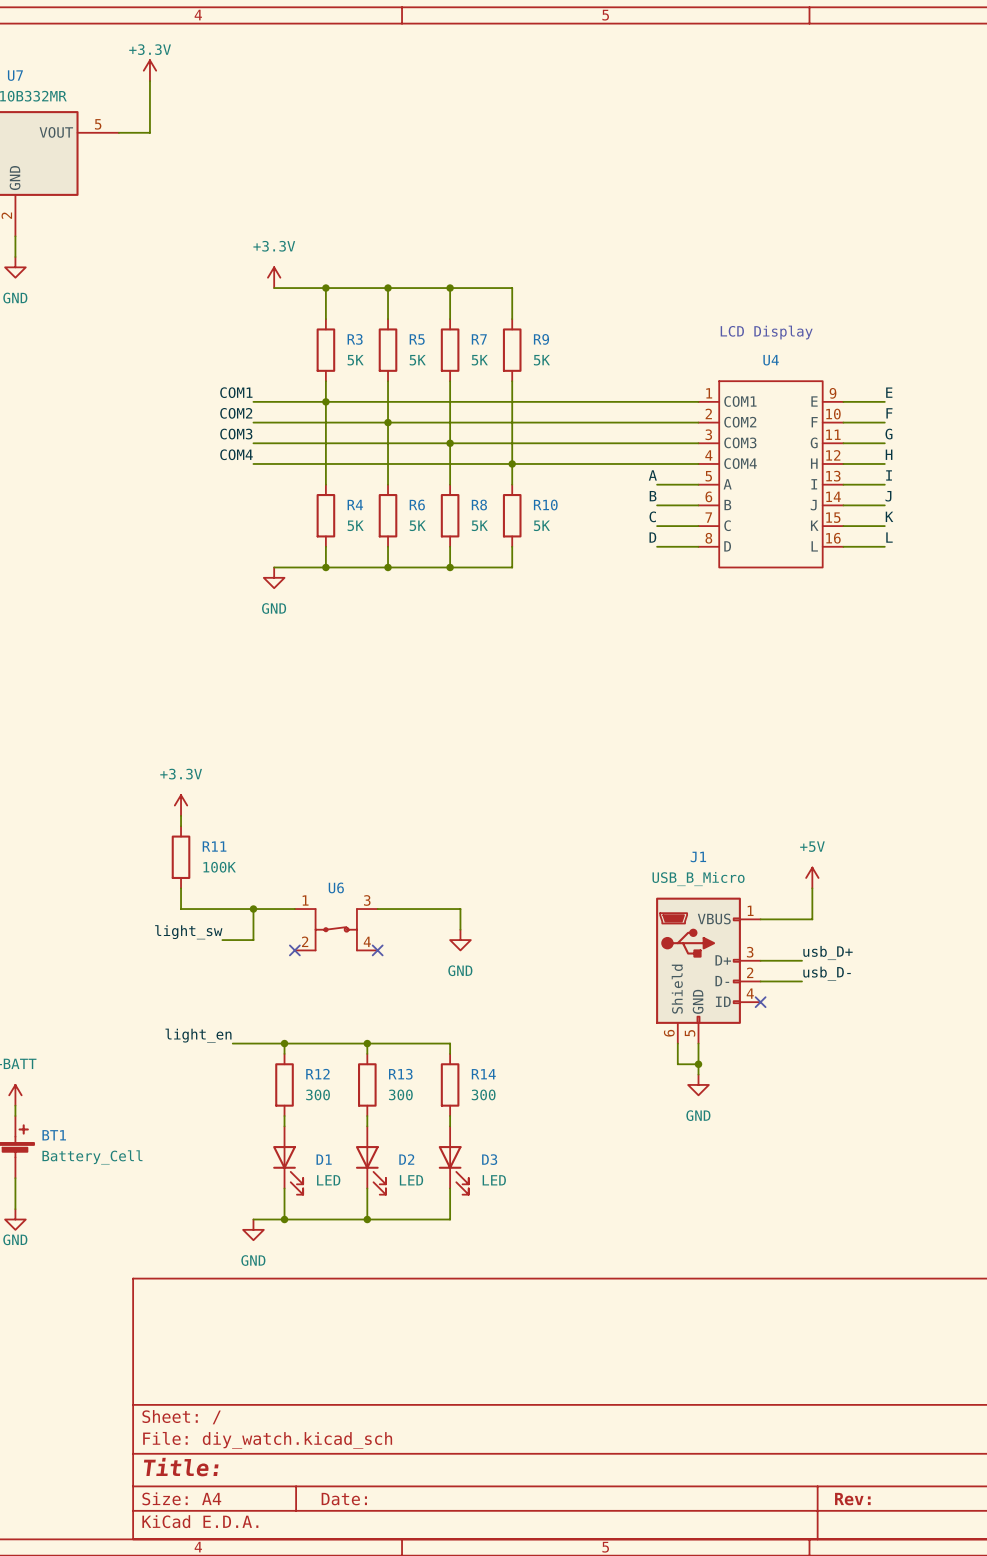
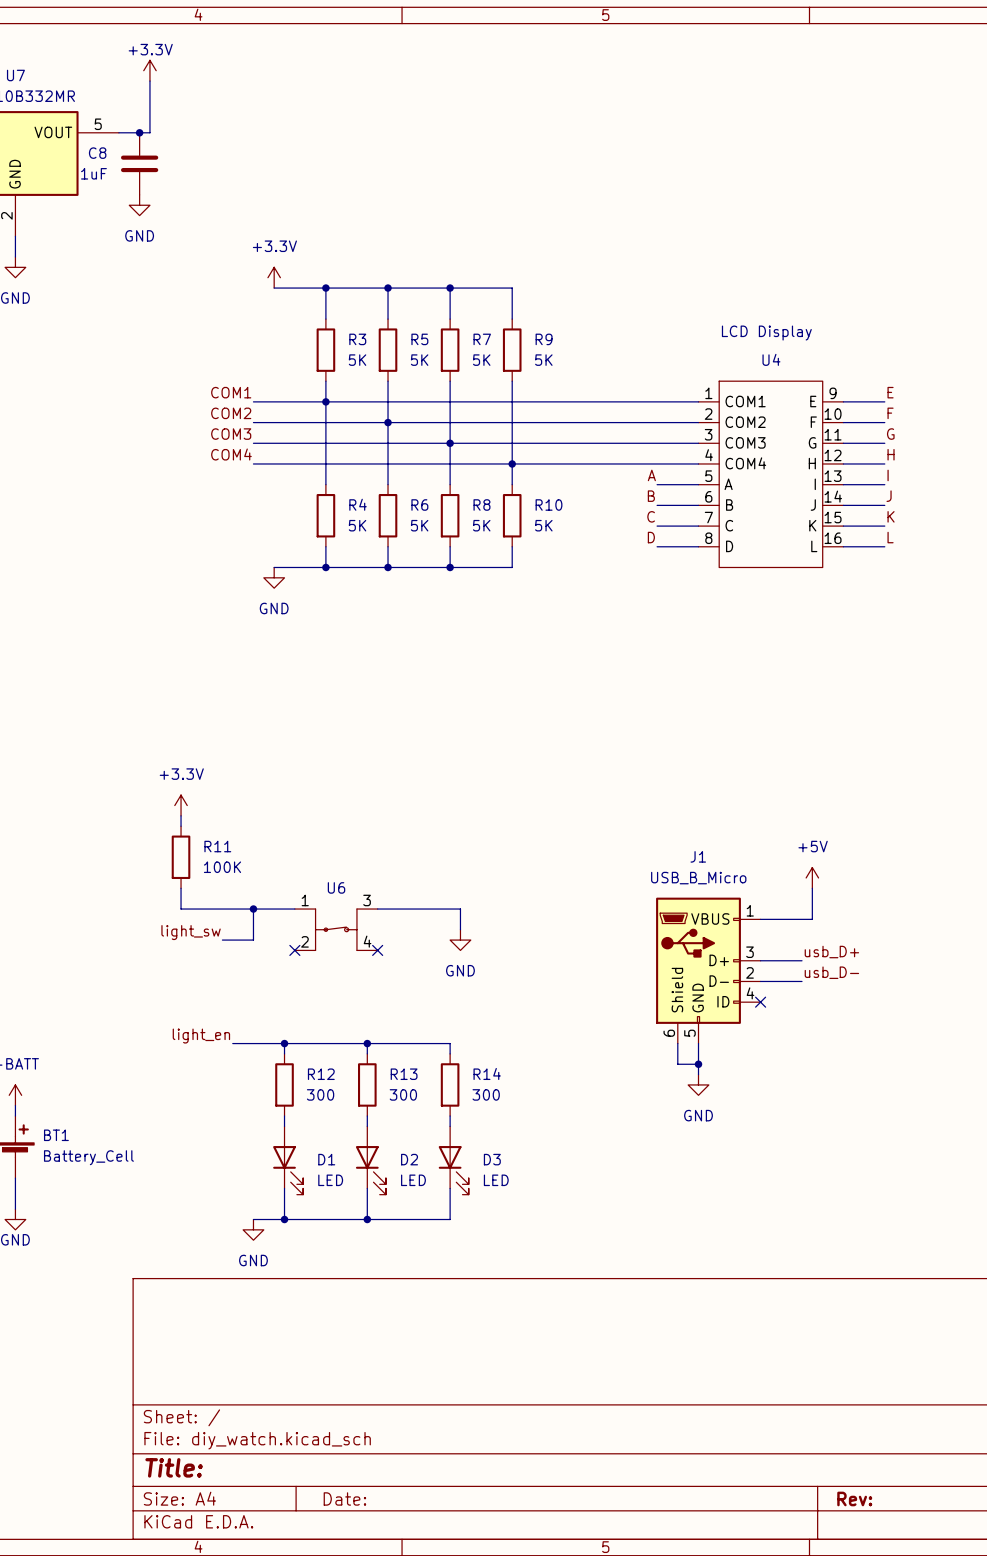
junction: none -> (139, 132)
C8: none -> 1uF (139, 163)
power symbol: none -> GND (139, 205)

